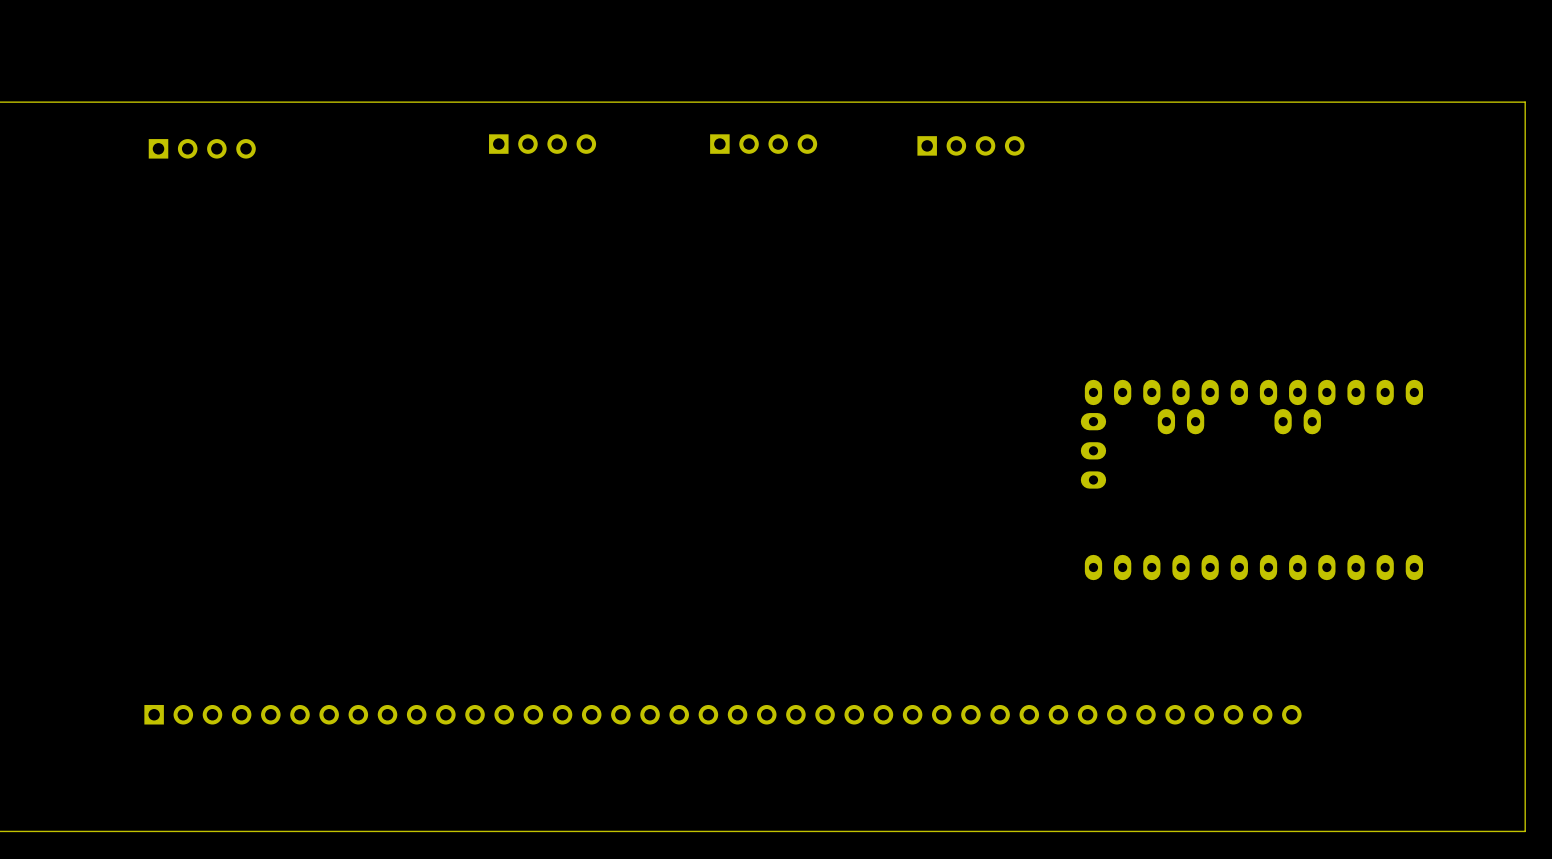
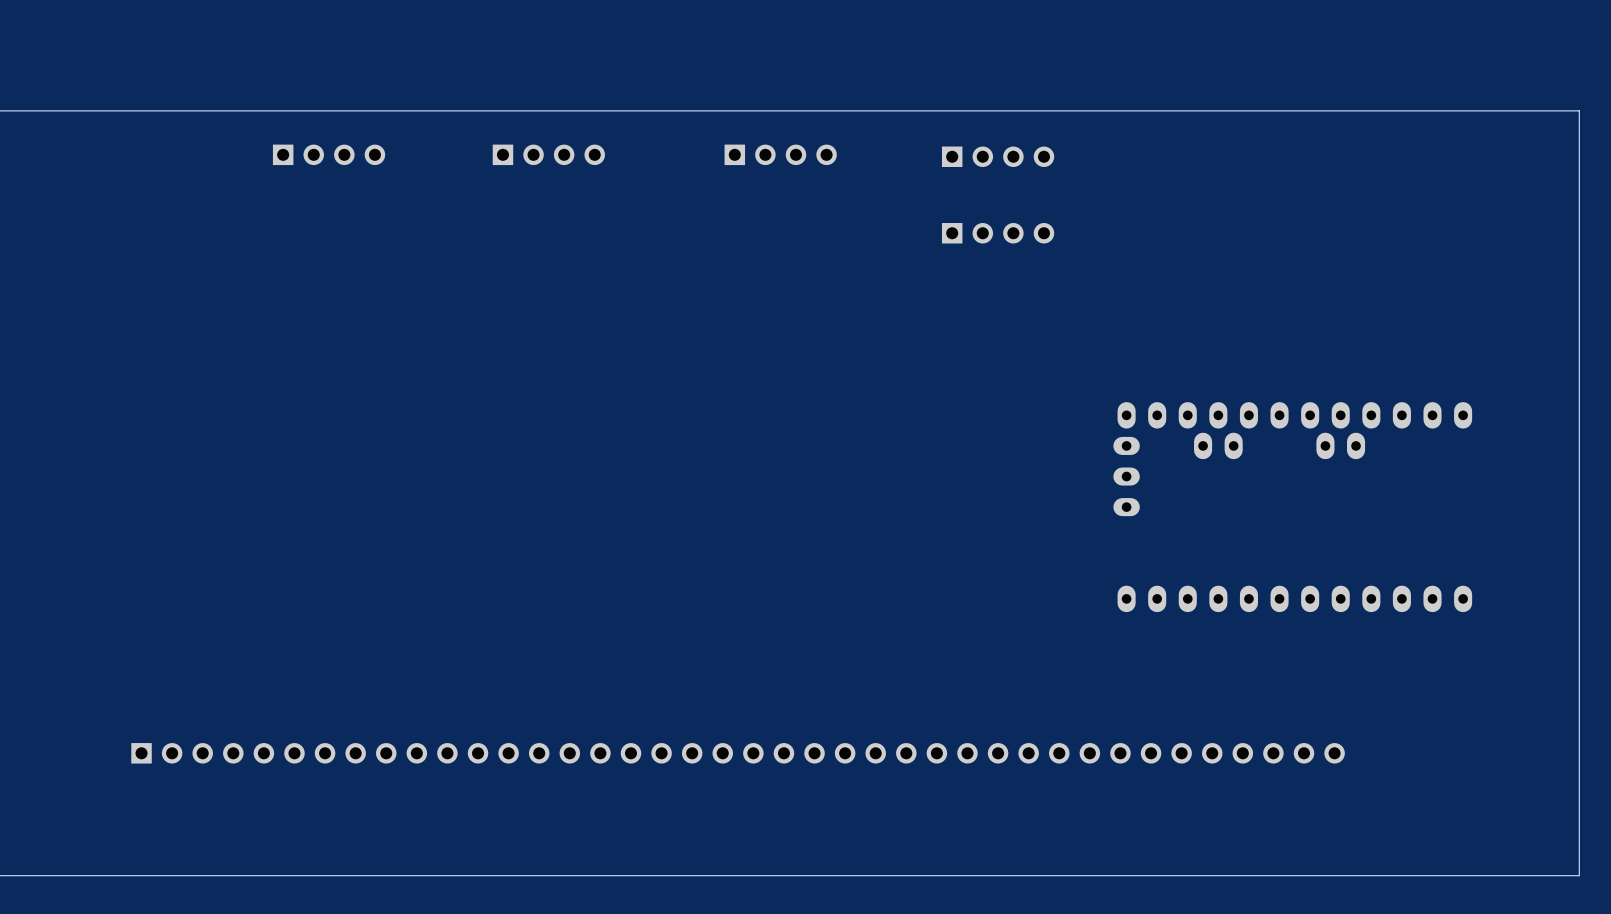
part position: (202, 148) -> (329, 154)
part: none -> (998, 233)

